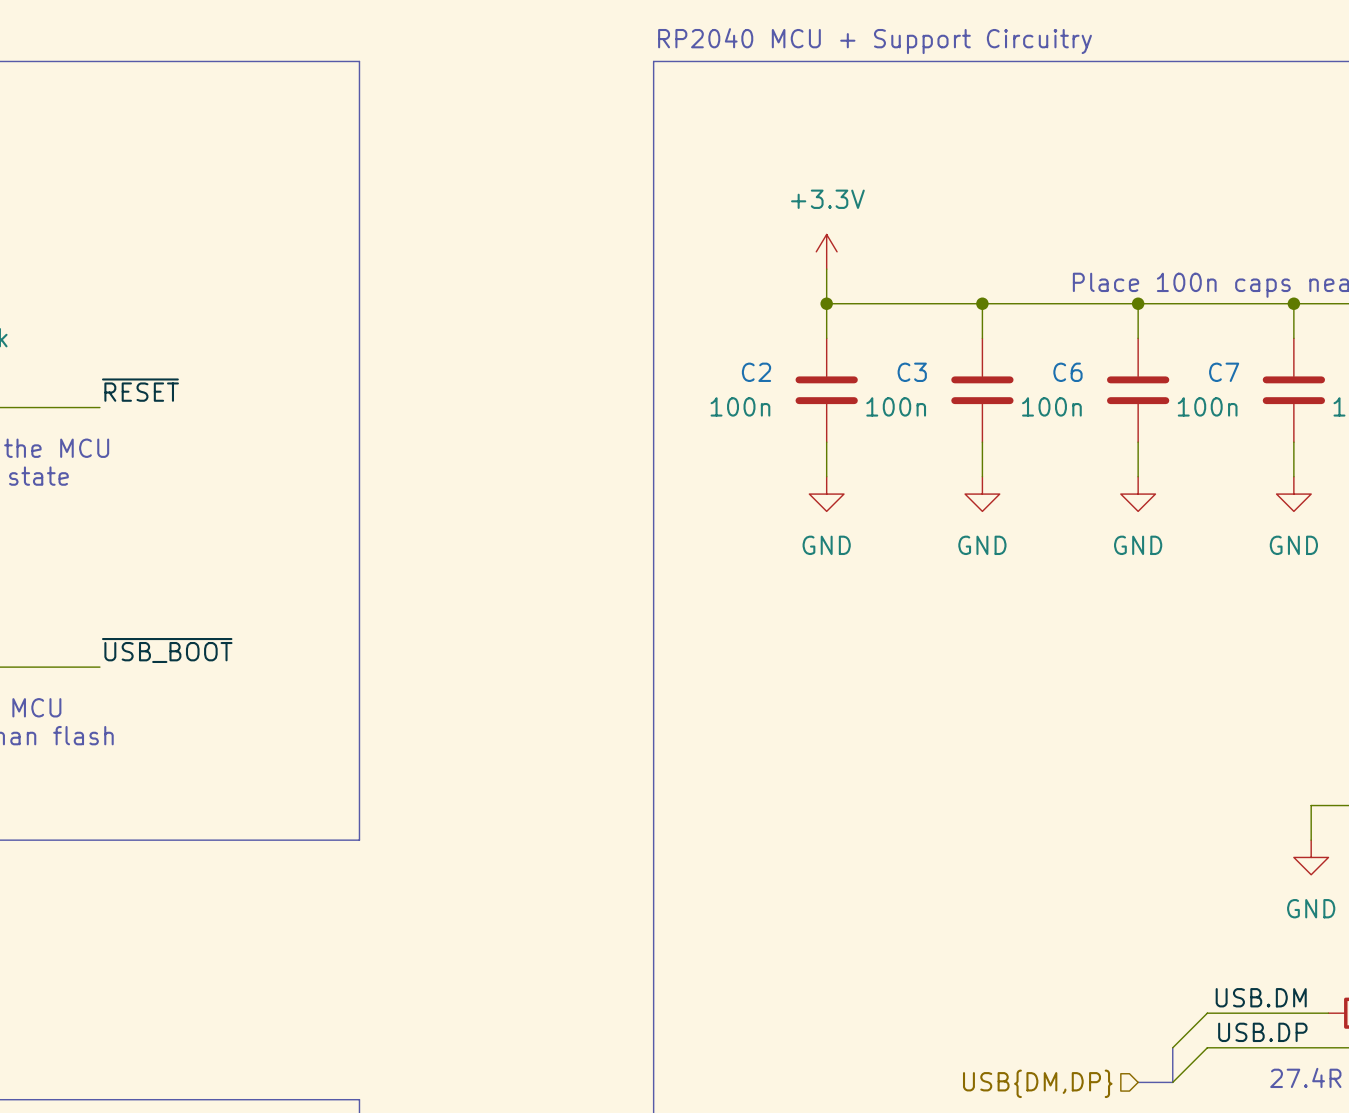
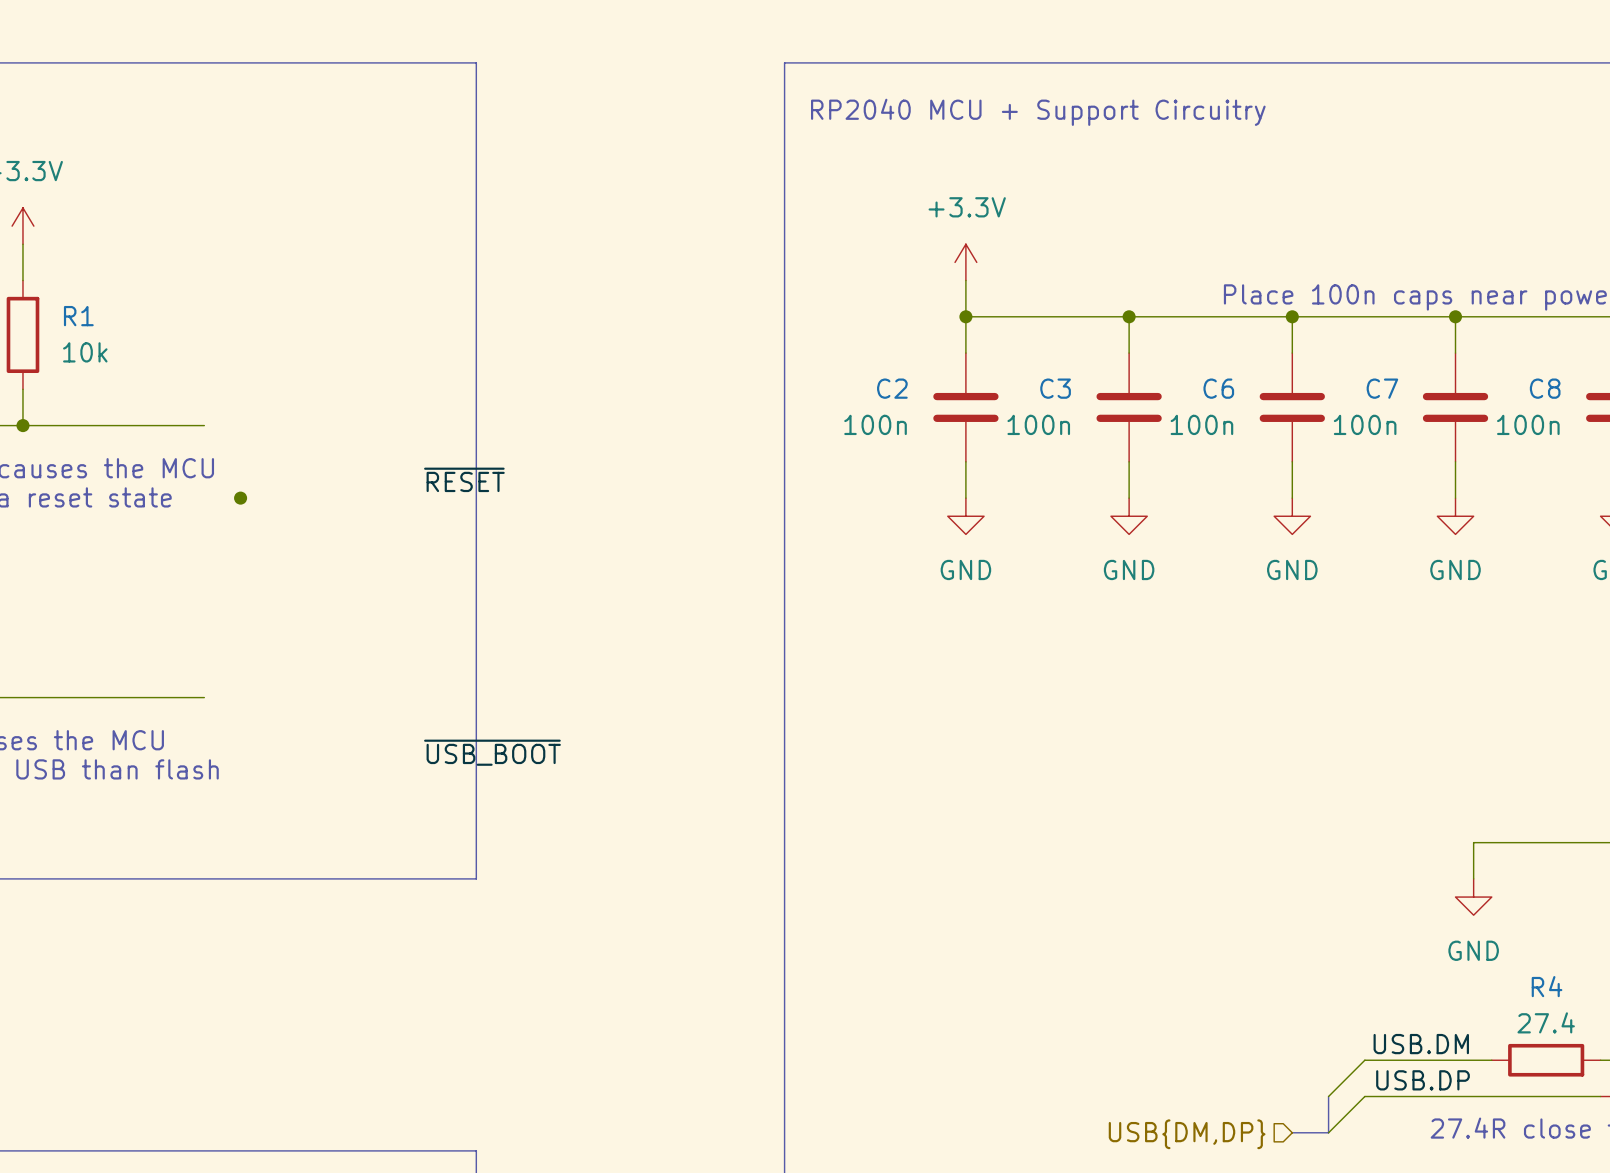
text position: RP2040 MCU + Support Circuitry (875, 41) -> RP2040 MCU + Support Circuitry (1038, 112)
label position: ~{RESET} (140, 390) -> ~{RESET} (464, 479)
junction: none -> (240, 498)
label position: ~{USB_BOOT} (167, 650) -> ~{USB_BOOT} (492, 752)

